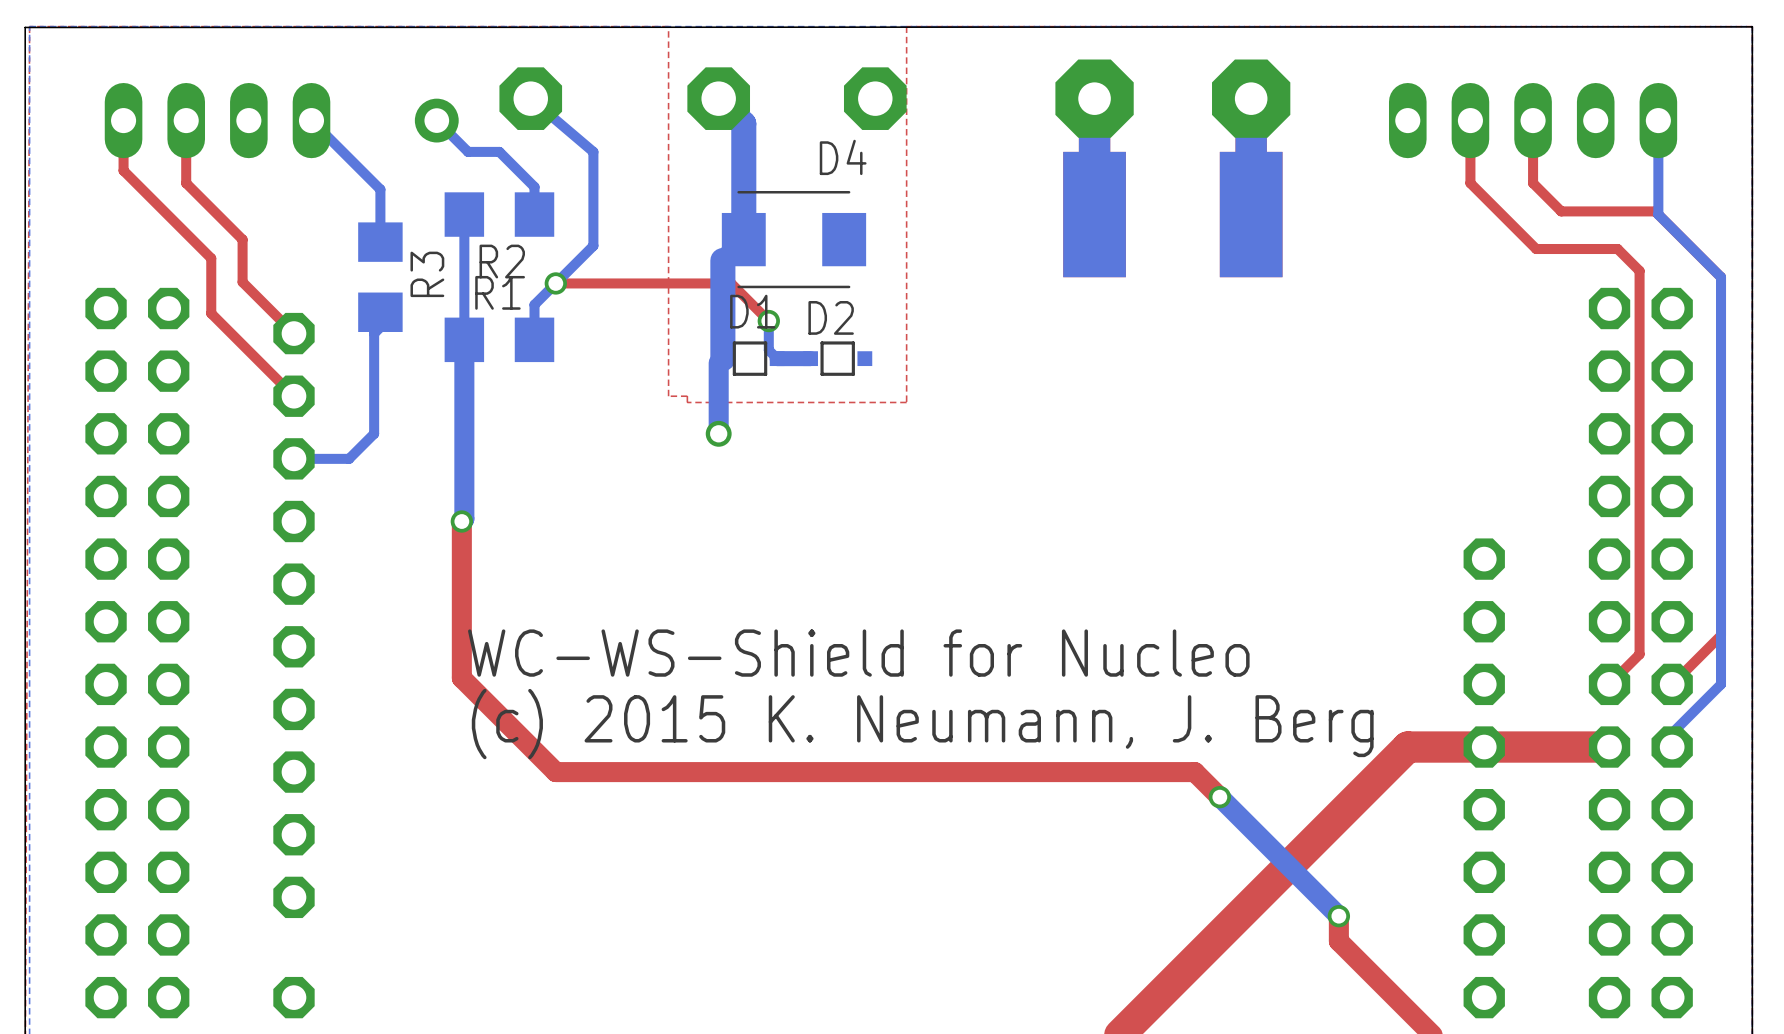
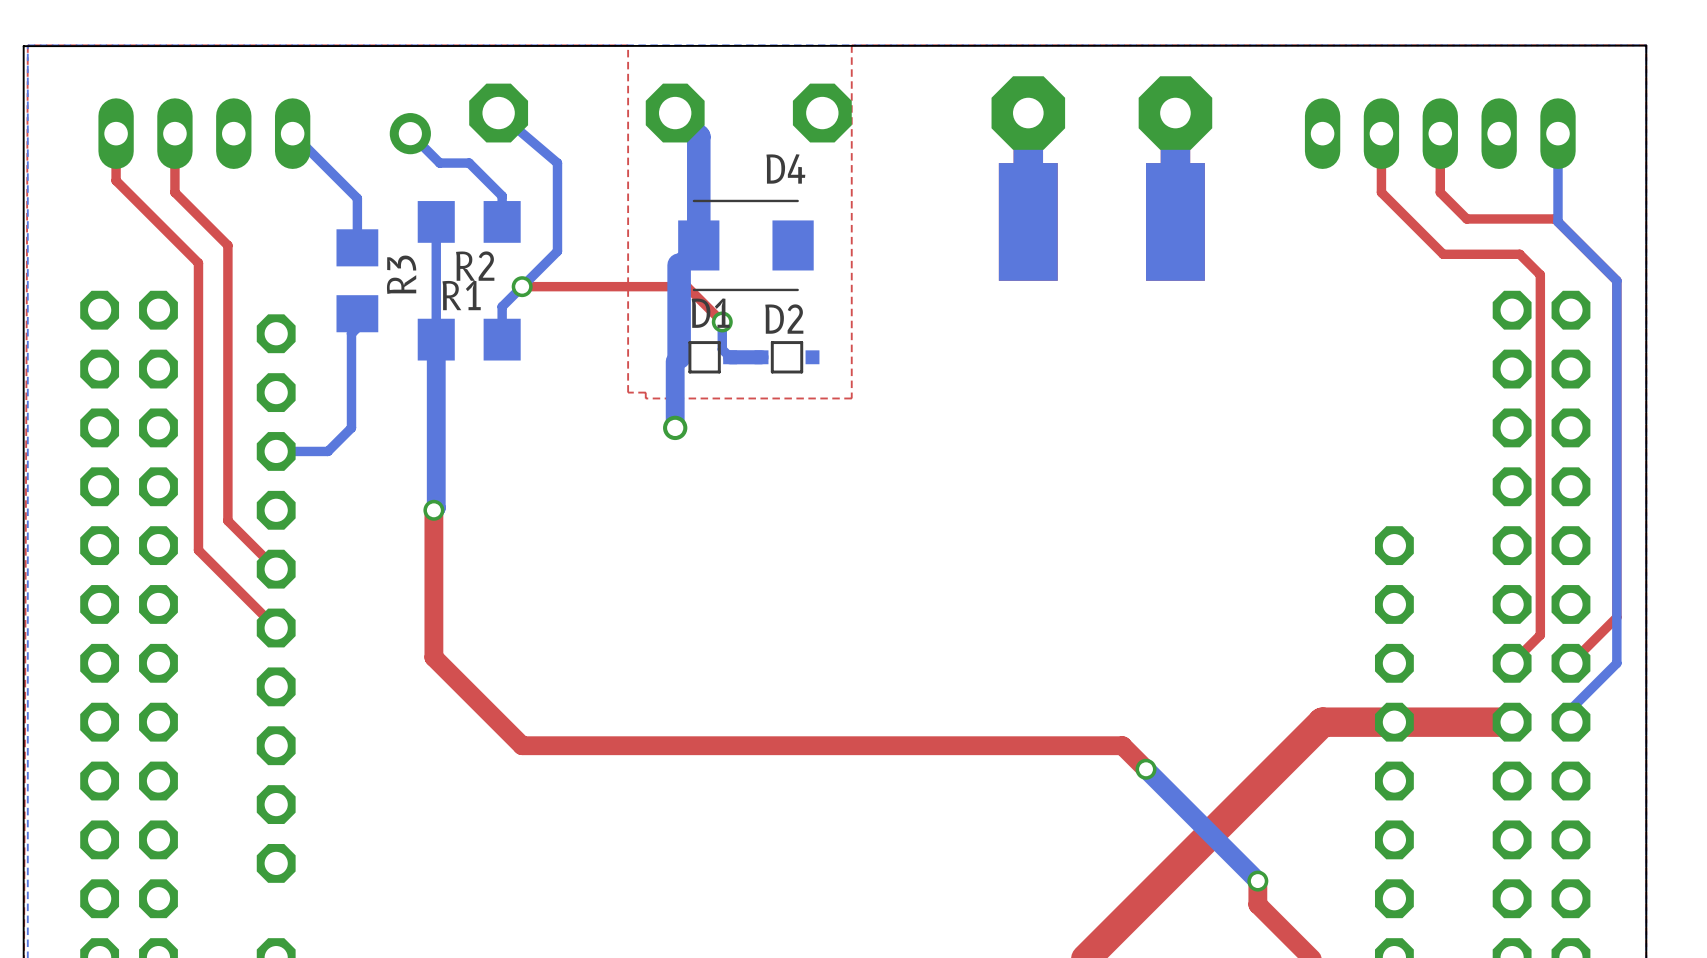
top track: (242, 282) (293, 333) -> (227, 285) (227, 520) (276, 569)
top track: (211, 313) (293, 396) -> (198, 314) (198, 550) (276, 628)
text: WC-WS-Shield for Nucleo (858, 653) -> none
text: (c) 2015 K. Neumann, J. Berg (922, 724) -> none

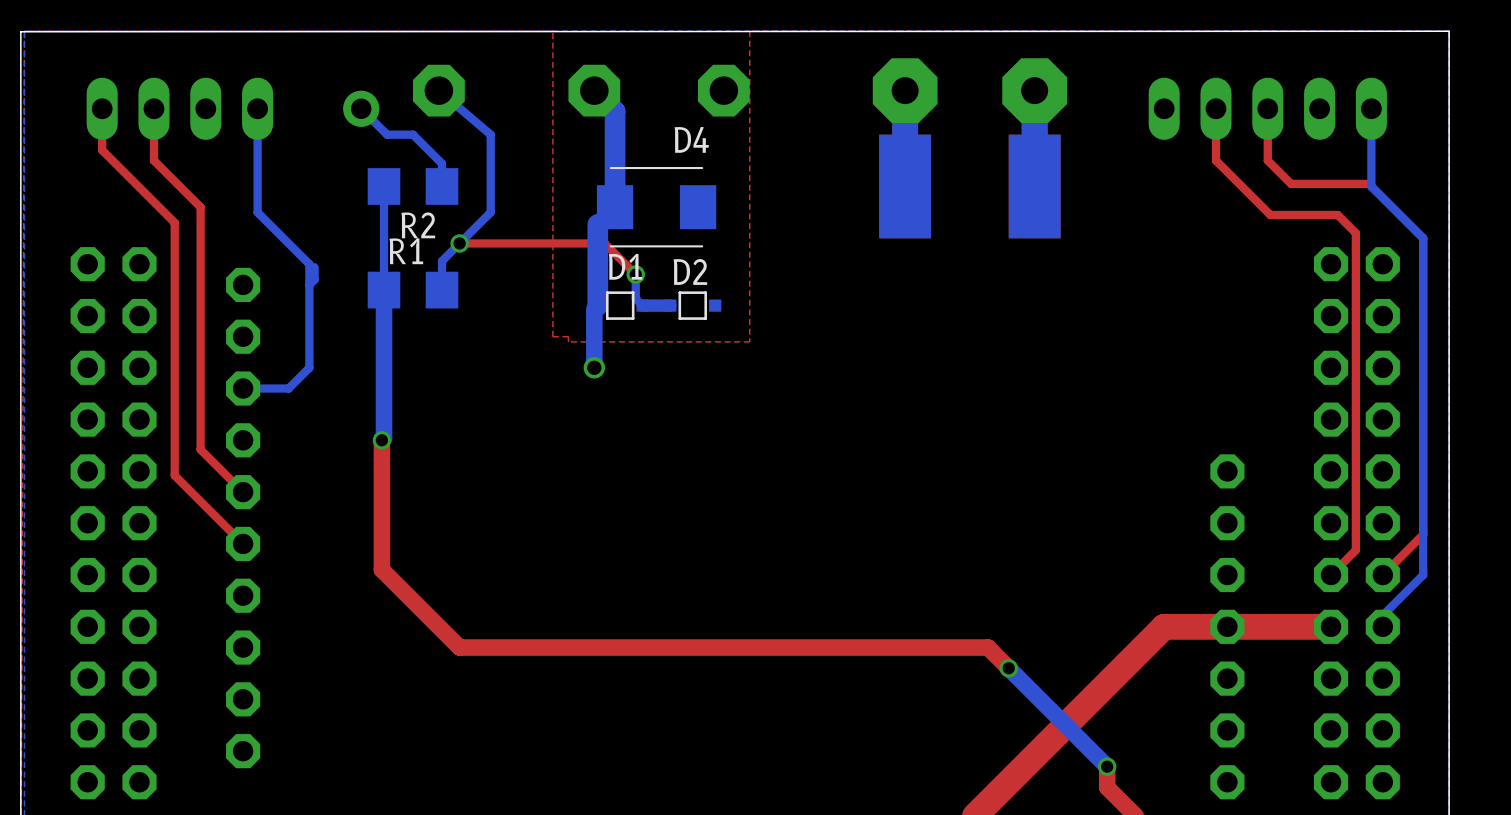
bottom track: (292, 133) (357, 198) (357, 247) -> (257, 108) (257, 212) (309, 264)
R3: (357, 280) -> none

